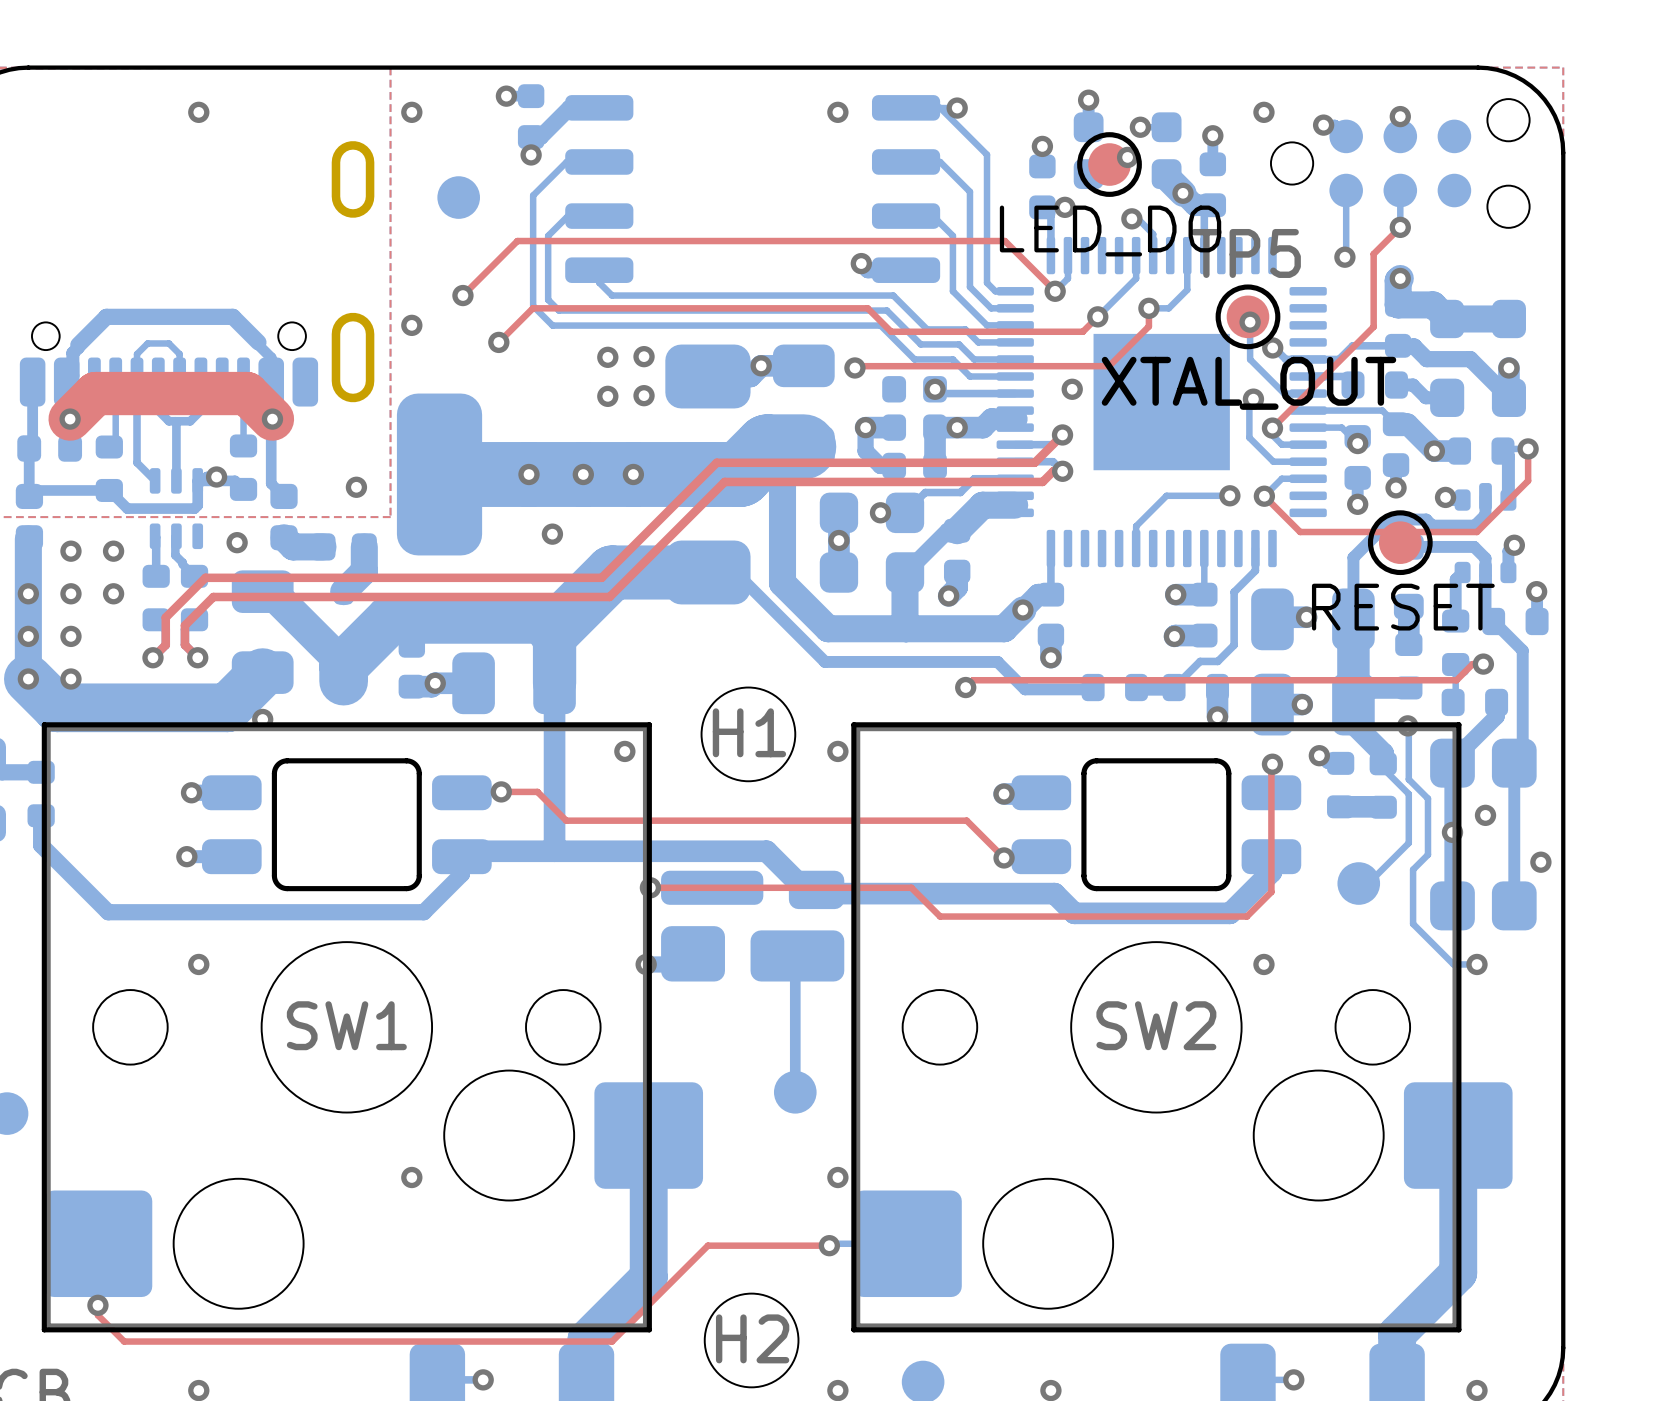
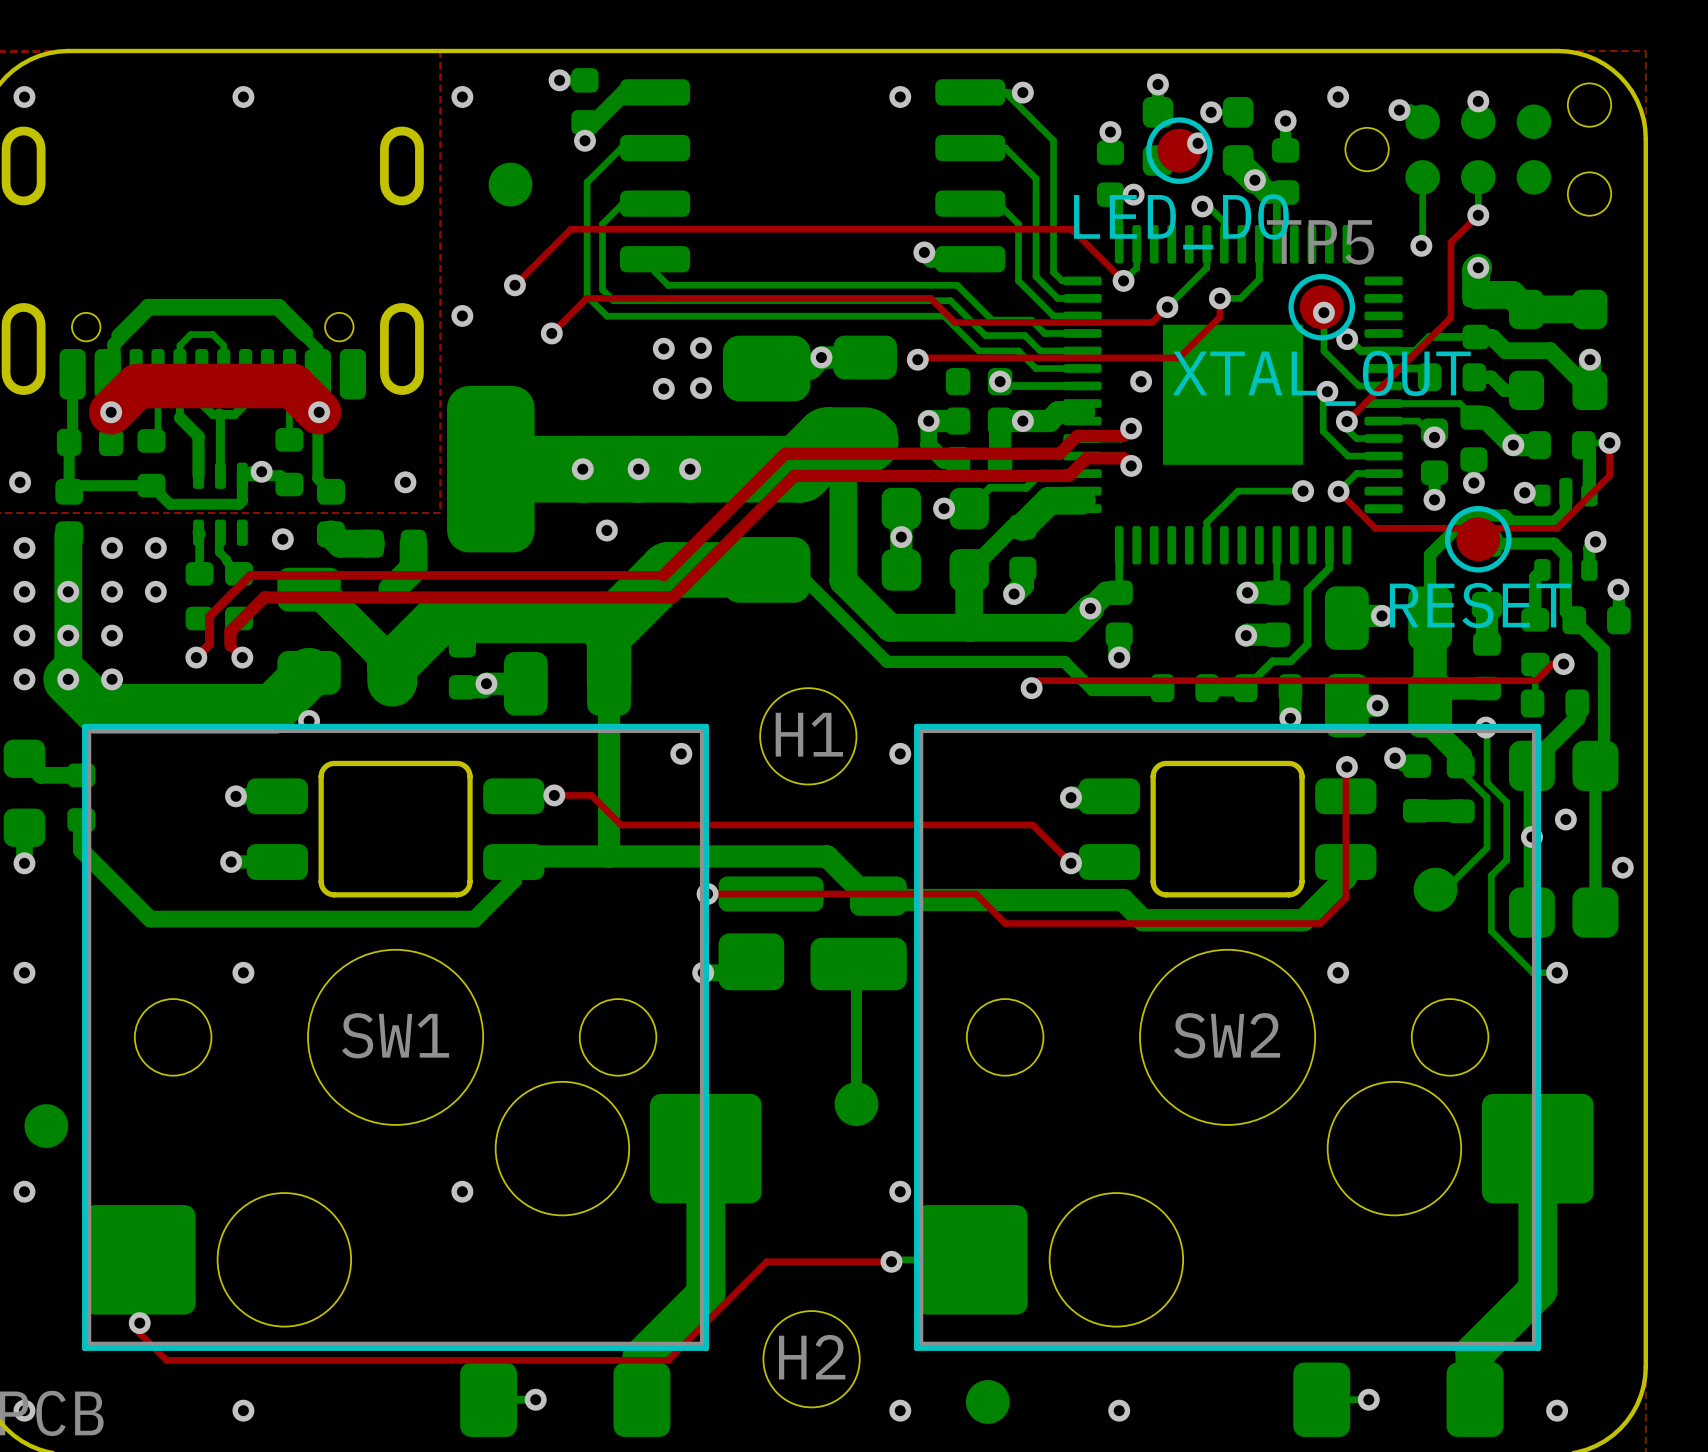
bottom track: (137, 424) (137, 462) (155, 480) -> (179, 417) (198, 436) (198, 475)
top track: (1055, 442) (1034, 462) (716, 462) (601, 577) -> (1123, 436) (1077, 436) (1059, 453) (785, 453) (663, 575)
top track: (1062, 471) (1053, 471) (1042, 481) (724, 481) (609, 596) (213, 596) (184, 625) (186, 646) -> (1131, 465) (1123, 458) (1086, 458) (1068, 475) (794, 475) (672, 597) (264, 597) (230, 631) (230, 645)

